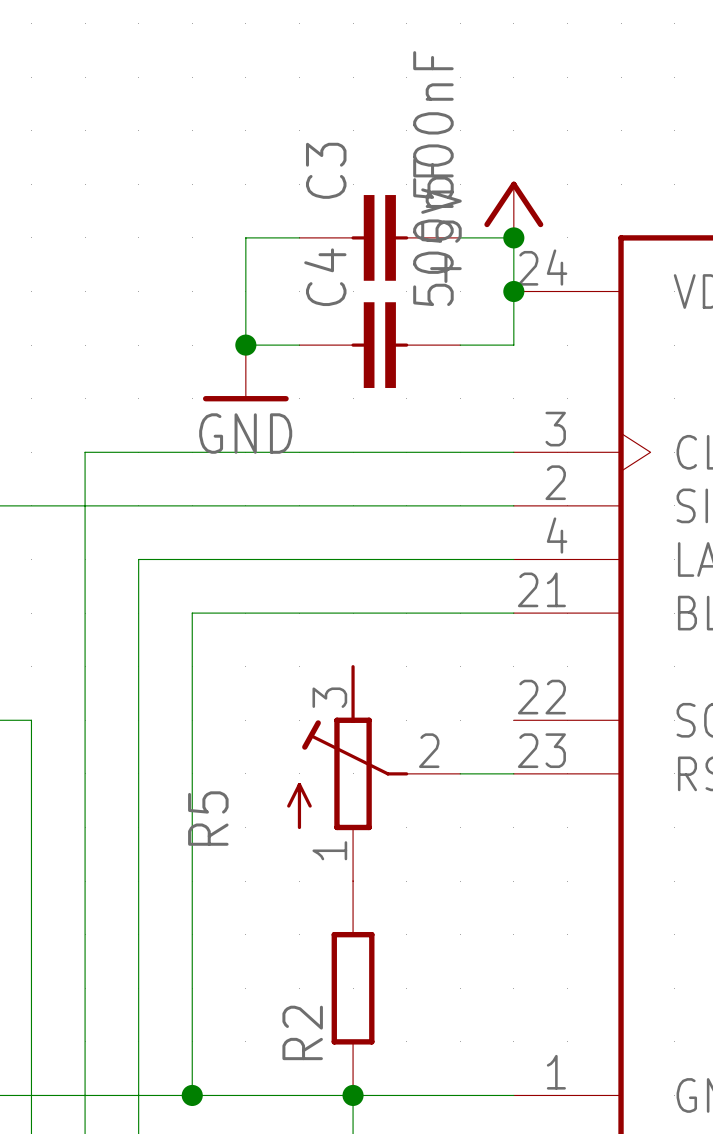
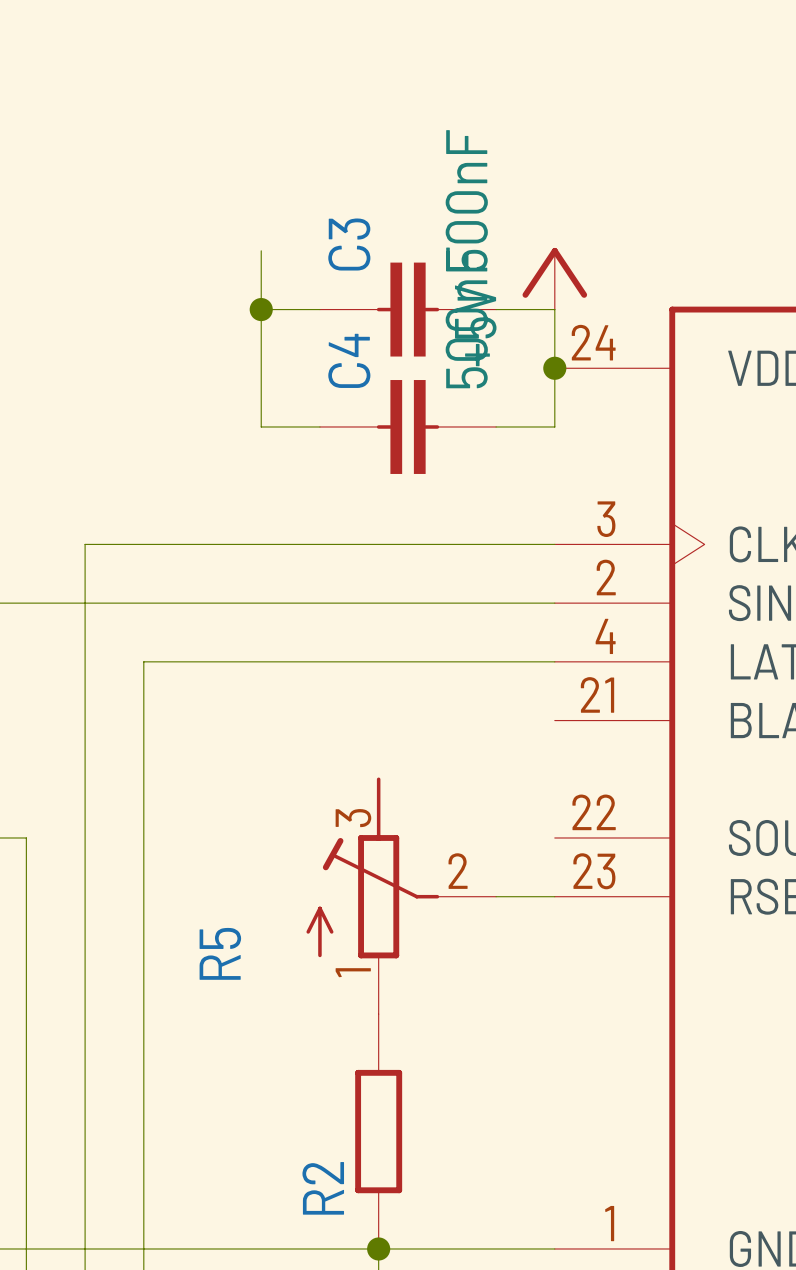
wire: none -> (261, 250) (261, 309)
junction: (513, 237) -> none
junction position: (245, 345) -> (261, 309)
power symbol: GND (245, 373) -> none
wire: (513, 613) (192, 613) (192, 1095) -> none
junction: (192, 1095) -> none

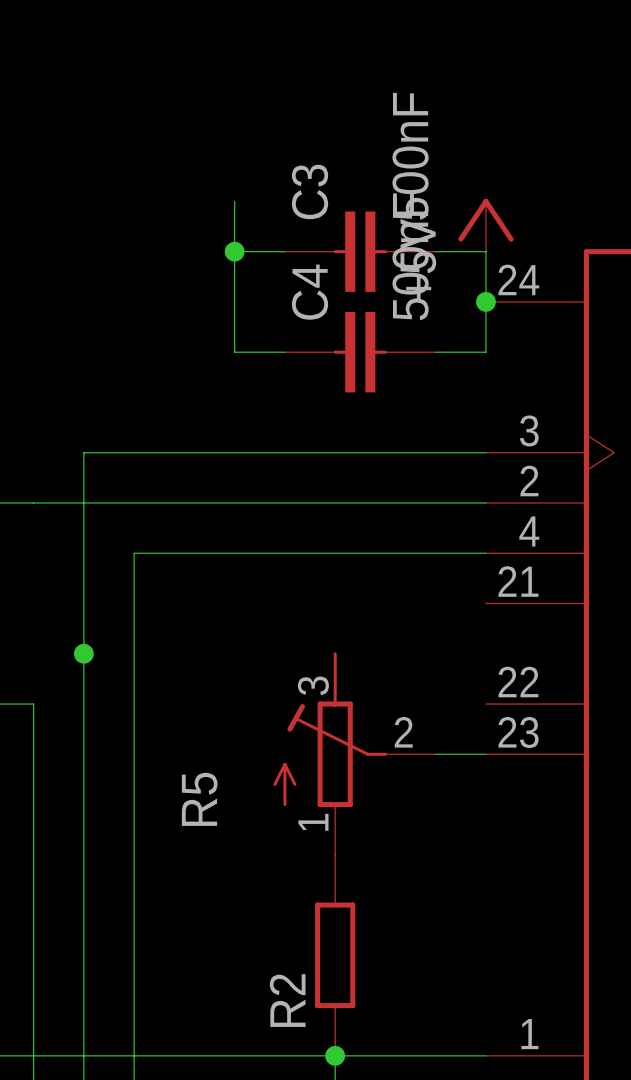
junction: none -> (83, 653)

